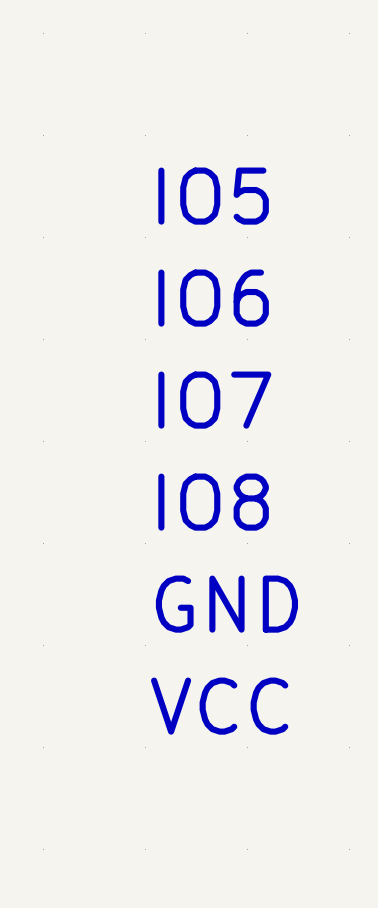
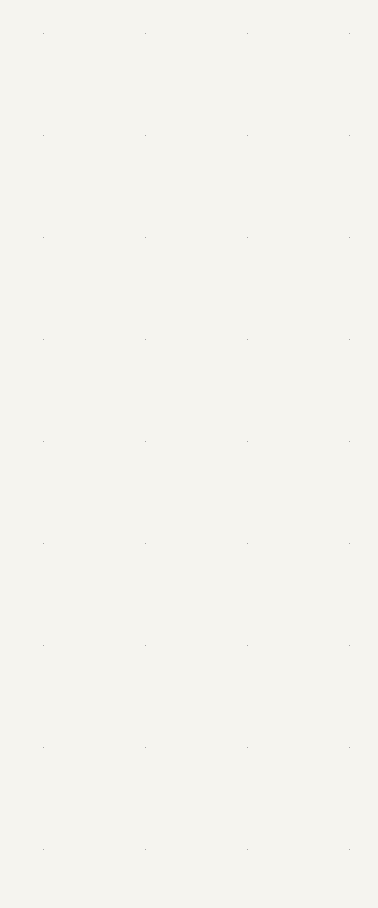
text: IO5 (213, 196) -> none
text: IO6 (213, 298) -> none
text: IO7 (214, 400) -> none
text: IO8 (213, 502) -> none
text: GND (226, 604) -> none
text: VCC (219, 706) -> none

